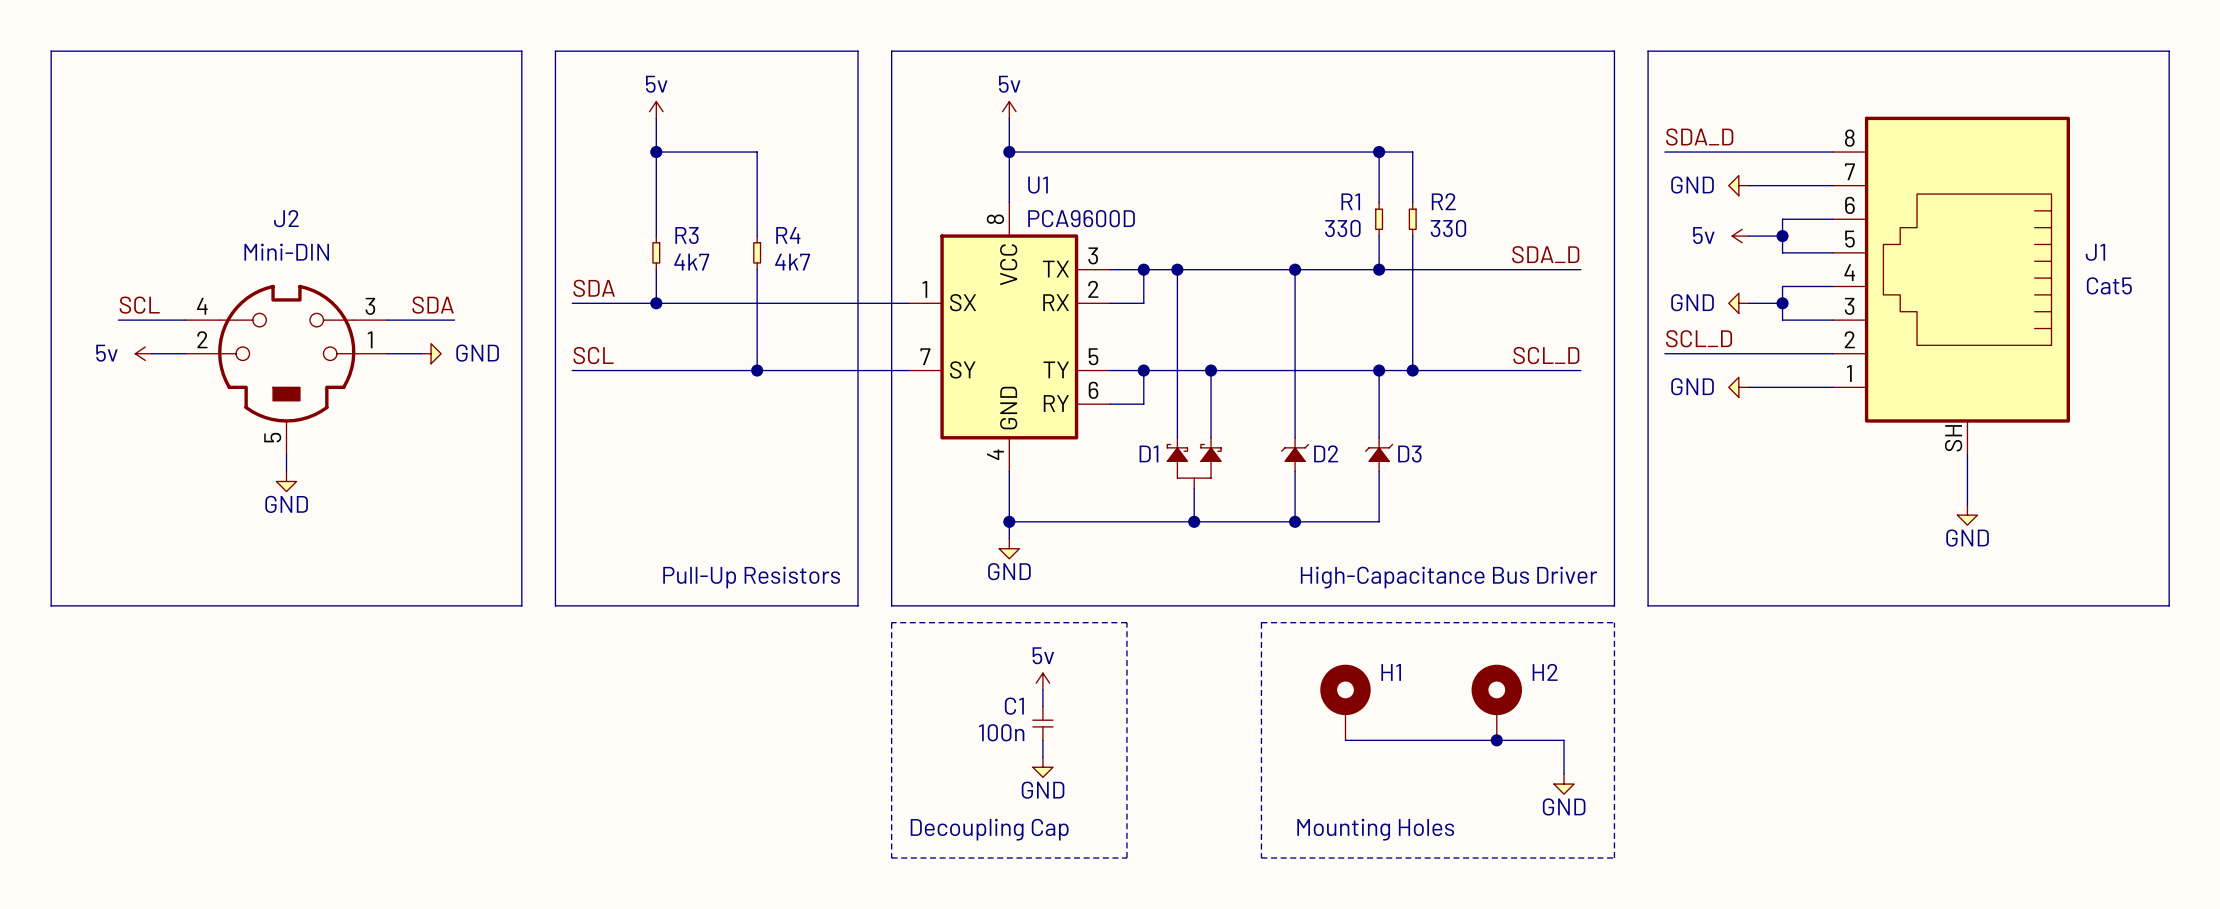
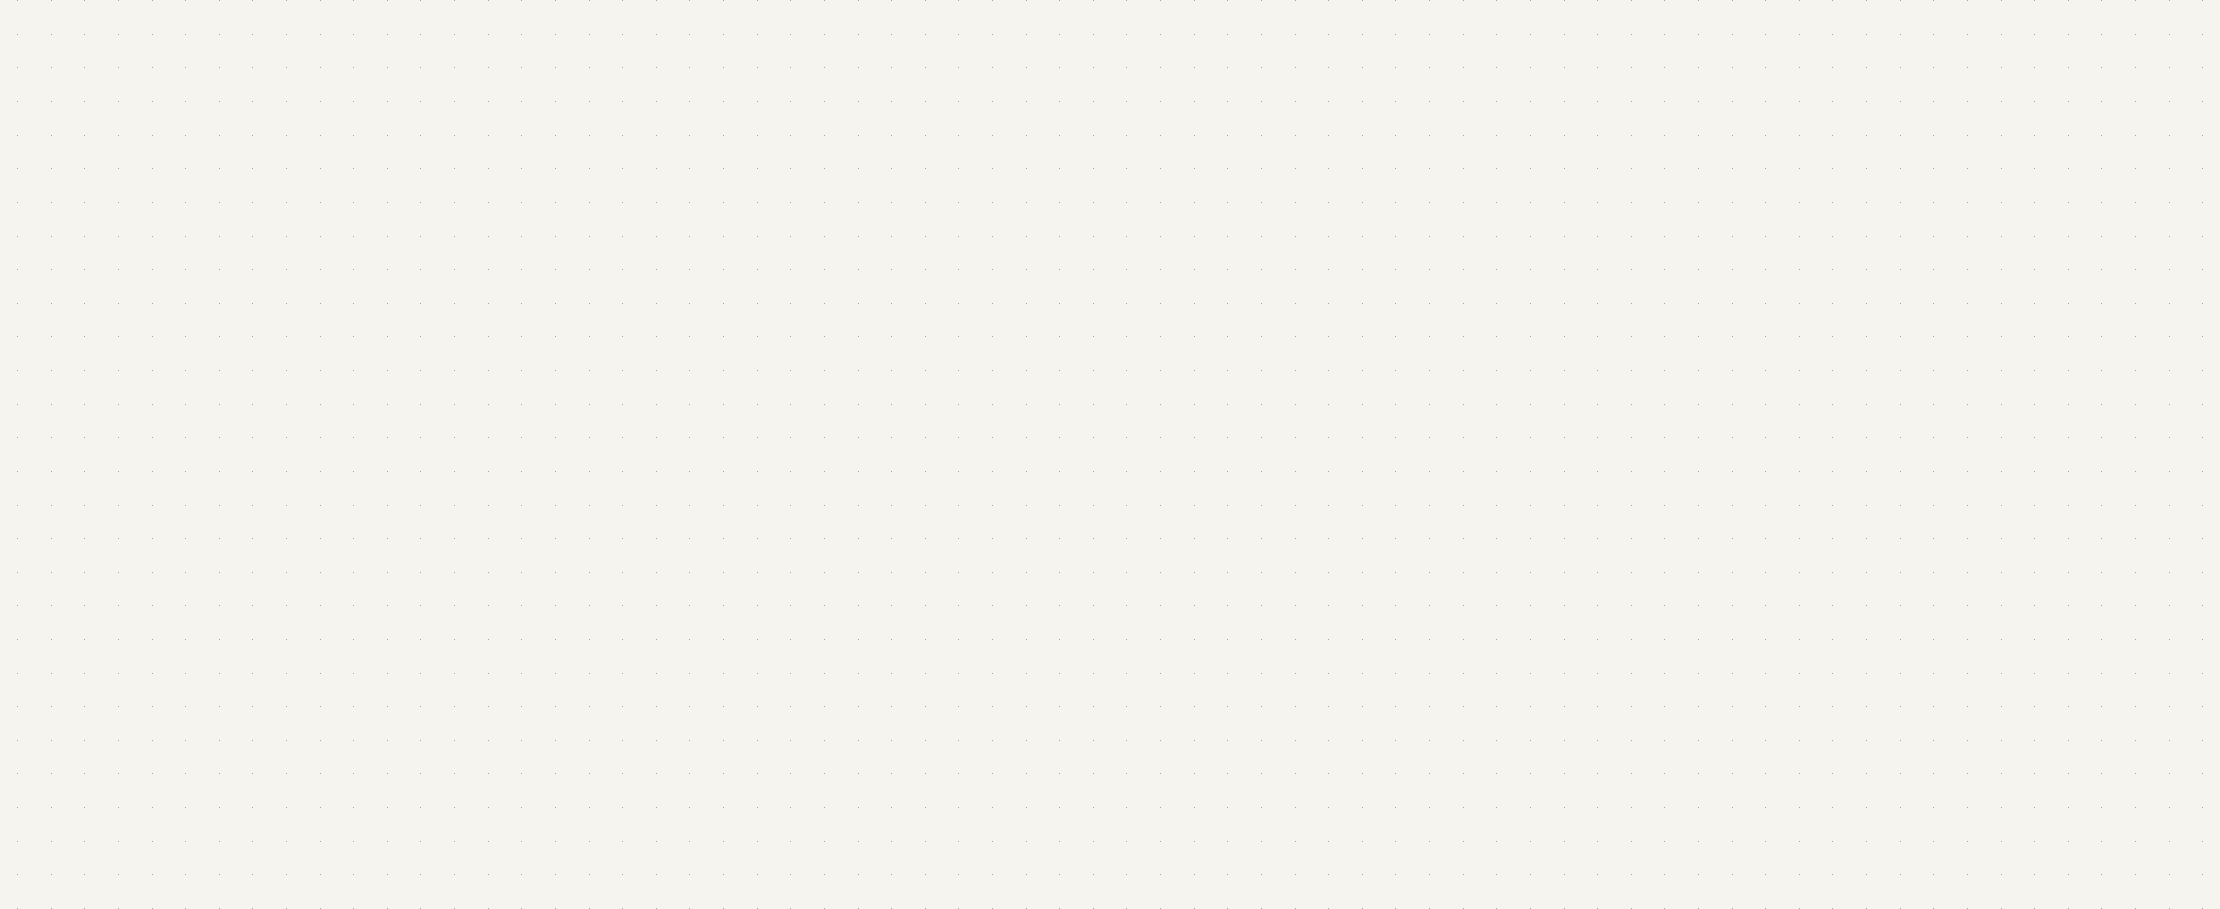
line: (51, 51) (51, 605) (521, 605) (521, 51) (51, 51) -> none
line: (555, 51) (858, 51) (858, 605) (555, 605) (555, 51) -> none
line: (891, 51) (1614, 51) (1614, 605) (891, 605) (891, 51) -> none
line: (1648, 51) (2169, 51) (2169, 605) (1648, 605) (1648, 51) -> none
power symbol: 5v (656, 109) -> none
power symbol: 5v (1009, 109) -> none
wire: (656, 118) (656, 236) -> none
wire: (1009, 118) (1009, 202) -> none
label: SDA_D (1699, 137) -> none
wire: (656, 152) (757, 152) (757, 236) -> none
junction: (656, 152) -> none
wire: (1009, 152) (1412, 152) (1412, 202) -> none
junction: (1009, 152) -> none
wire: (1379, 152) (1379, 202) -> none
junction: (1379, 152) -> none
wire: (1664, 152) (1832, 152) -> none
power symbol: GND (1738, 185) -> none
wire: (1748, 185) (1832, 185) -> none
R1: 330 (1379, 219) -> none
R2: 330 (1412, 219) -> none
wire: (1832, 219) (1782, 219) (1782, 252) (1832, 252) -> none
wire: (1379, 236) (1379, 269) -> none
wire: (1412, 236) (1412, 370) -> none
power symbol: 5v (1740, 236) -> none
wire: (1748, 236) (1782, 236) -> none
junction: (1782, 236) -> none
R3: 4k7 (656, 252) -> none
R4: 4k7 (757, 252) -> none
label: SDA_D (1545, 254) -> none
wire: (656, 269) (656, 303) -> none
wire: (757, 269) (757, 370) -> none
wire: (1110, 269) (1580, 269) -> none
wire: (1143, 269) (1143, 303) (1110, 303) -> none
junction: (1143, 269) -> none
wire: (1177, 269) (1177, 437) -> none
junction: (1177, 269) -> none
wire: (1295, 269) (1295, 437) -> none
junction: (1295, 269) -> none
junction: (1379, 269) -> none
J1: Cat5 (1951, 285) -> none
wire: (1832, 286) (1782, 286) (1782, 320) (1832, 320) -> none
label: SDA (594, 288) -> none
wire: (572, 303) (908, 303) -> none
junction: (656, 303) -> none
power symbol: GND (1738, 303) -> none
wire: (1748, 303) (1782, 303) -> none
junction: (1782, 303) -> none
label: SCL (139, 305) -> none
label: SDA (433, 305) -> none
wire: (118, 320) (185, 320) -> none
wire: (387, 320) (454, 320) -> none
U1: PCA9600D (1009, 336) -> none
label: SCL_D (1699, 338) -> none
power symbol: 5v (143, 353) -> none
wire: (152, 353) (185, 353) -> none
wire: (387, 353) (420, 353) -> none
power symbol: GND (431, 353) -> none
wire: (1664, 353) (1832, 353) -> none
label: SCL (593, 355) -> none
label: SCL_D (1546, 355) -> none
J2: Mini-DIN (286, 369) -> none
wire: (572, 370) (908, 370) -> none
junction: (757, 370) -> none
wire: (1110, 370) (1580, 370) -> none
wire: (1143, 370) (1143, 404) (1110, 404) -> none
junction: (1143, 370) -> none
wire: (1211, 370) (1211, 437) -> none
junction: (1211, 370) -> none
wire: (1379, 370) (1379, 437) -> none
junction: (1379, 370) -> none
junction: (1412, 370) -> none
power symbol: GND (1738, 387) -> none
wire: (1748, 387) (1832, 387) -> none
wire: (286, 454) (286, 471) -> none
D2: (1295, 454) -> none
D3: (1379, 454) -> none
wire: (1967, 454) (1967, 505) -> none
D1: (1194, 462) -> none
wire: (1009, 471) (1009, 538) -> none
wire: (1295, 471) (1295, 521) -> none
wire: (1379, 471) (1379, 521) (1009, 521) -> none
power symbol: GND (286, 481) -> none
wire: (1194, 488) (1194, 521) -> none
power symbol: GND (1967, 515) -> none
junction: (1009, 521) -> none
junction: (1194, 521) -> none
junction: (1295, 521) -> none
power symbol: GND (1009, 548) -> none
text: Pull-Up Resistors (751, 577) -> none
text: High-Capacitance Bus Driver (1449, 577) -> none
line: (891, 622) (1126, 622) (1126, 858) (891, 858) (891, 622) -> none
line: (1261, 622) (1614, 622) (1614, 858) (1261, 858) (1261, 622) -> none
power symbol: 5v (1042, 681) -> none
wire: (1042, 689) (1042, 706) -> none
H1: (1345, 702) -> none
H2: (1496, 702) -> none
C1: 100n (1042, 723) -> none
wire: (1042, 740) (1042, 757) -> none
wire: (1345, 740) (1564, 740) (1564, 773) -> none
junction: (1496, 740) -> none
power symbol: GND (1042, 767) -> none
power symbol: GND (1564, 784) -> none
text: Decoupling Cap (989, 829) -> none
text: Mounting Holes (1375, 829) -> none

